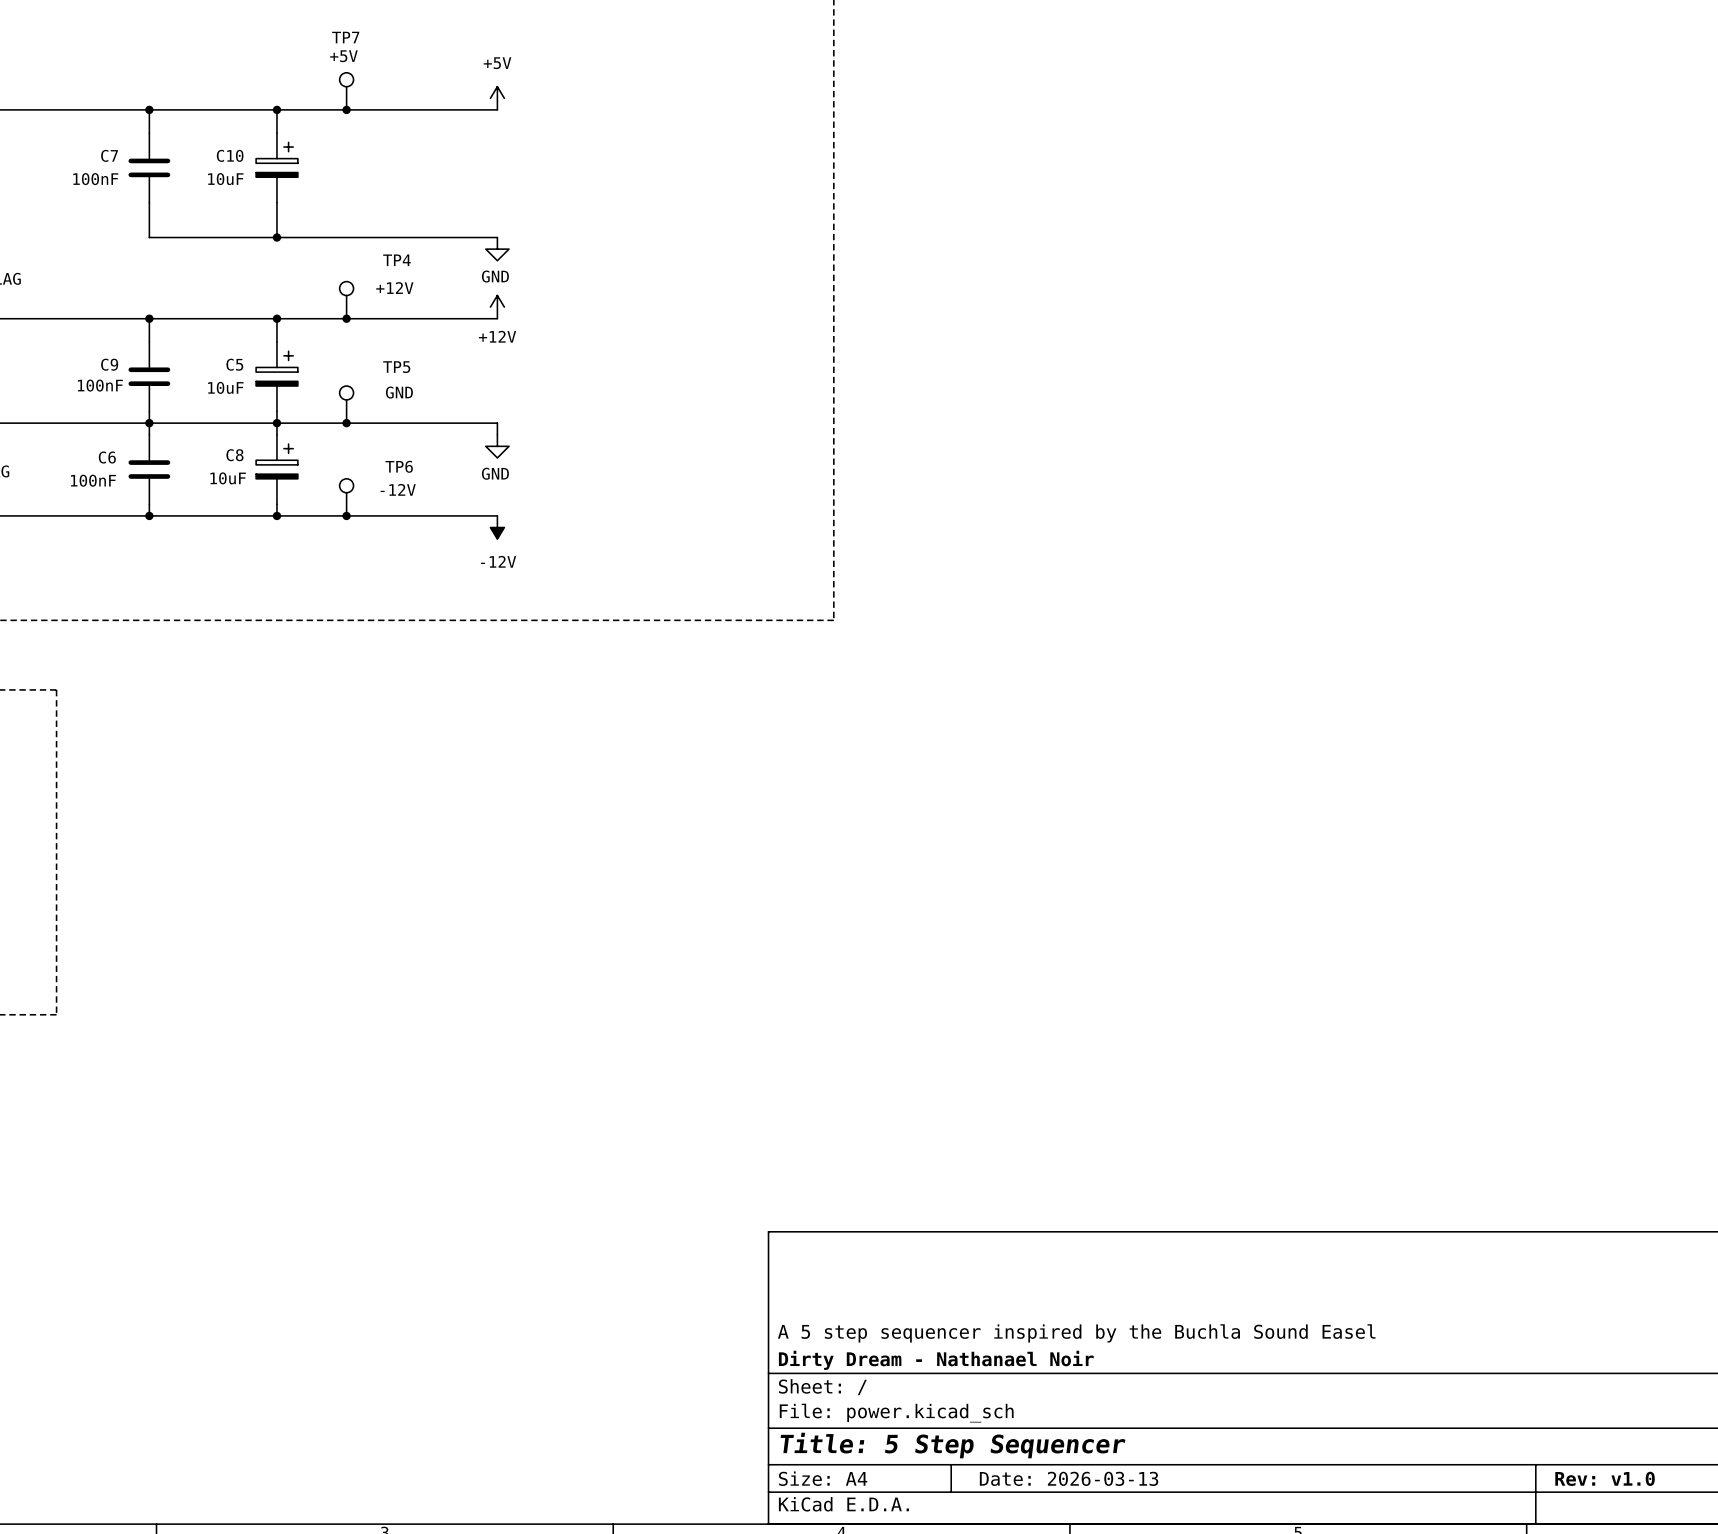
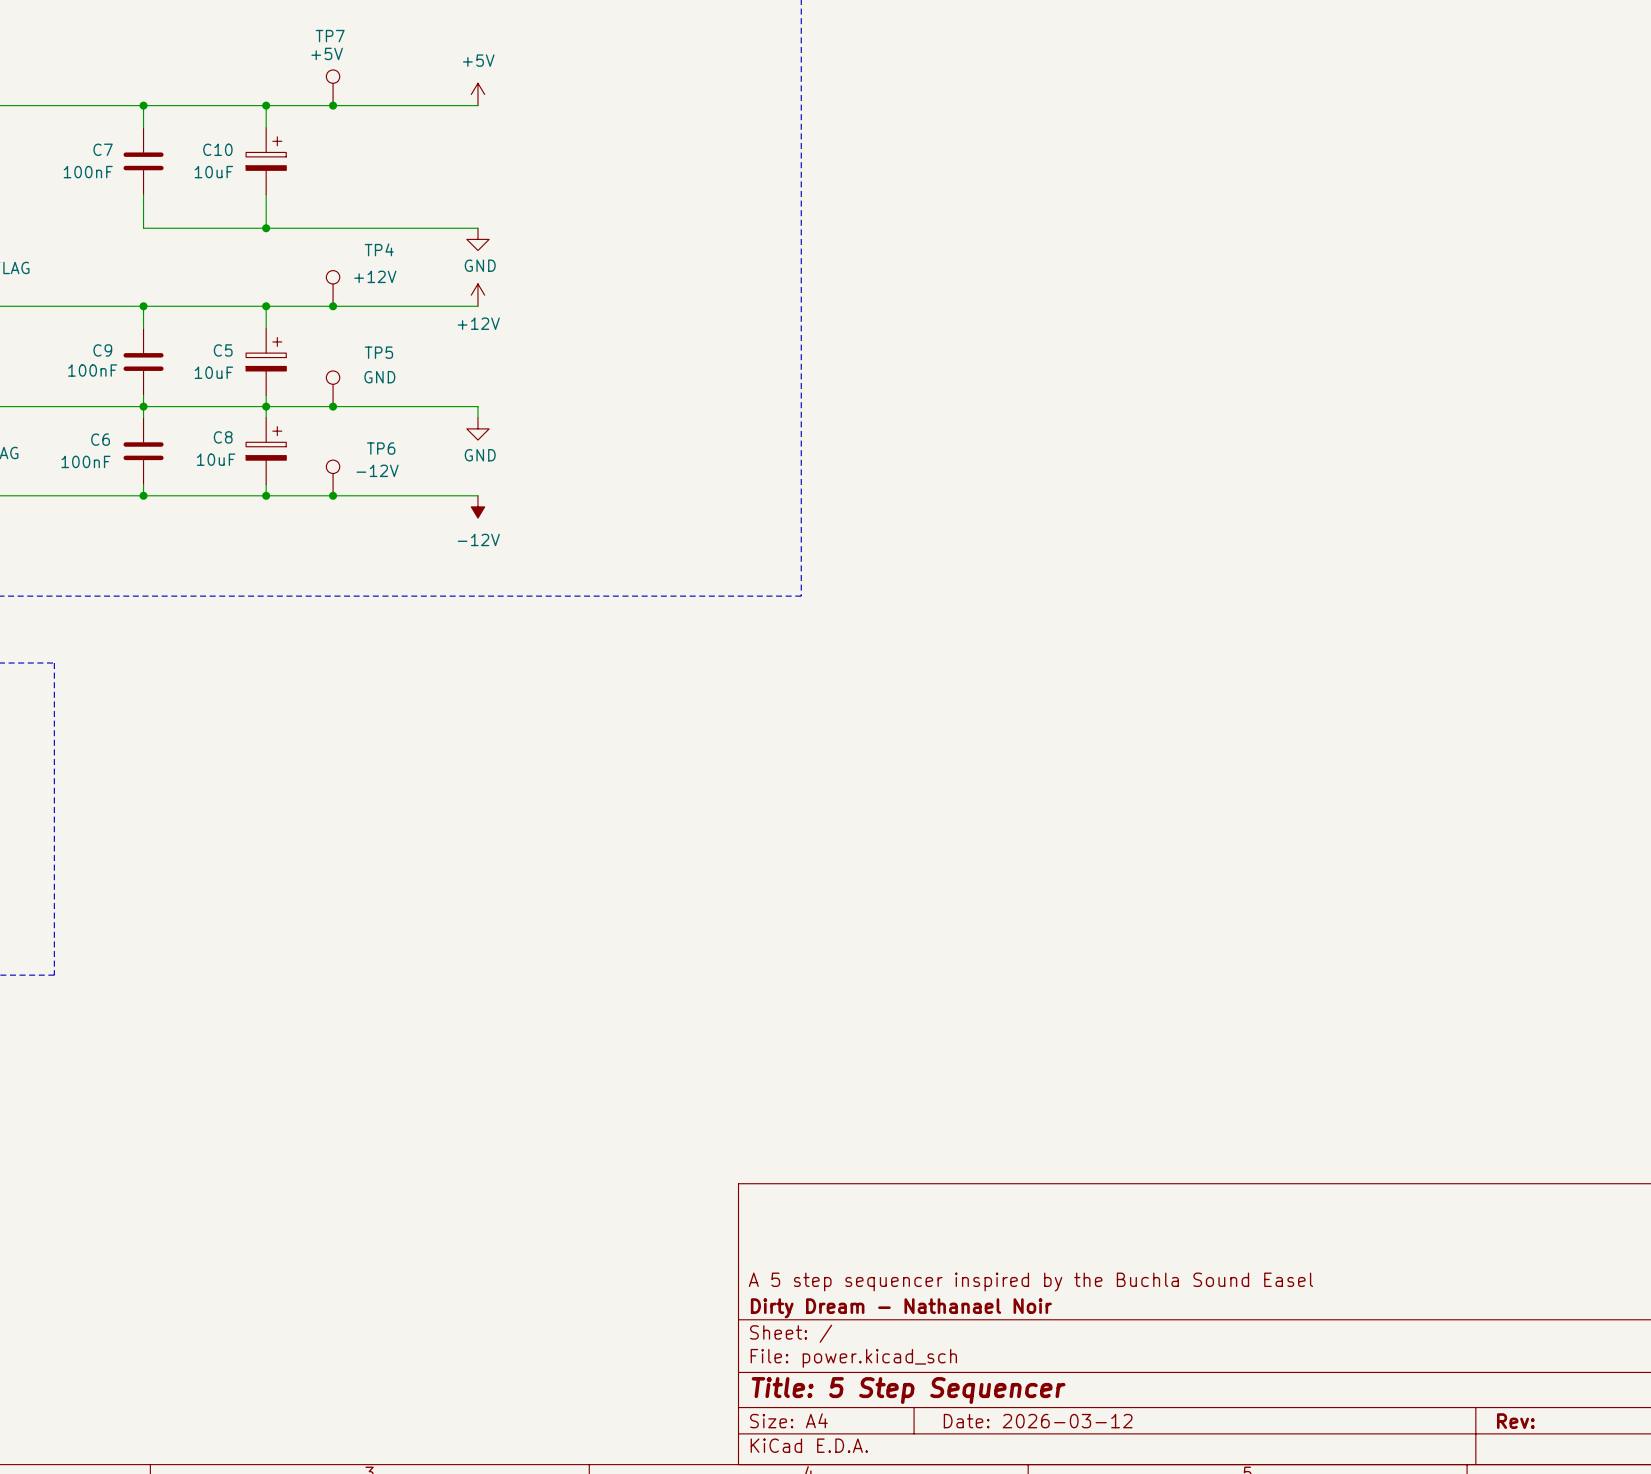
title block: Date: 2026-03-13 (1069, 1478) -> Date: 2026-03-12 (1038, 1421)
title block: Rev: v1.0 (1605, 1478) -> Rev: (1515, 1421)

